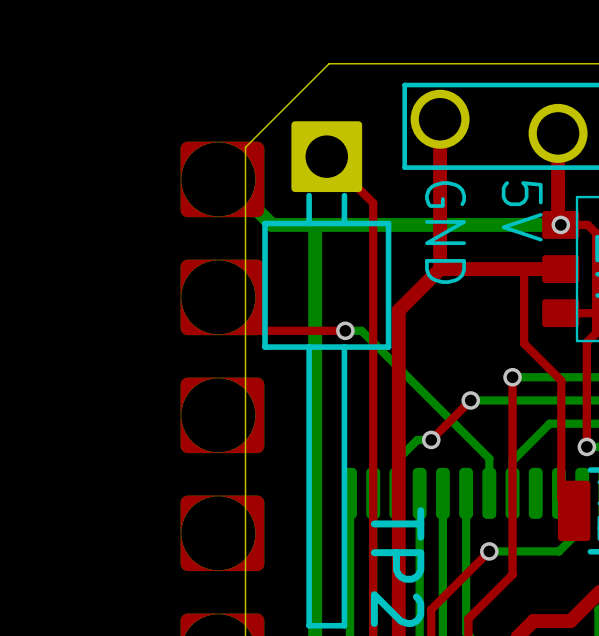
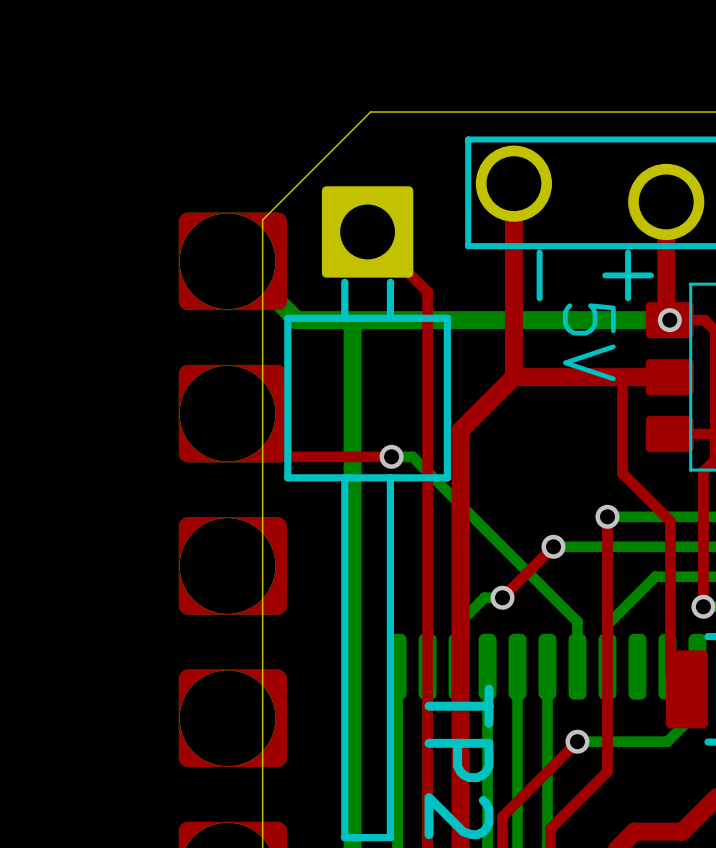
text: none -> + (628, 275)
text position: 5V (522, 211) -> 5V (589, 342)
text: GND (445, 232) -> - (539, 275)

